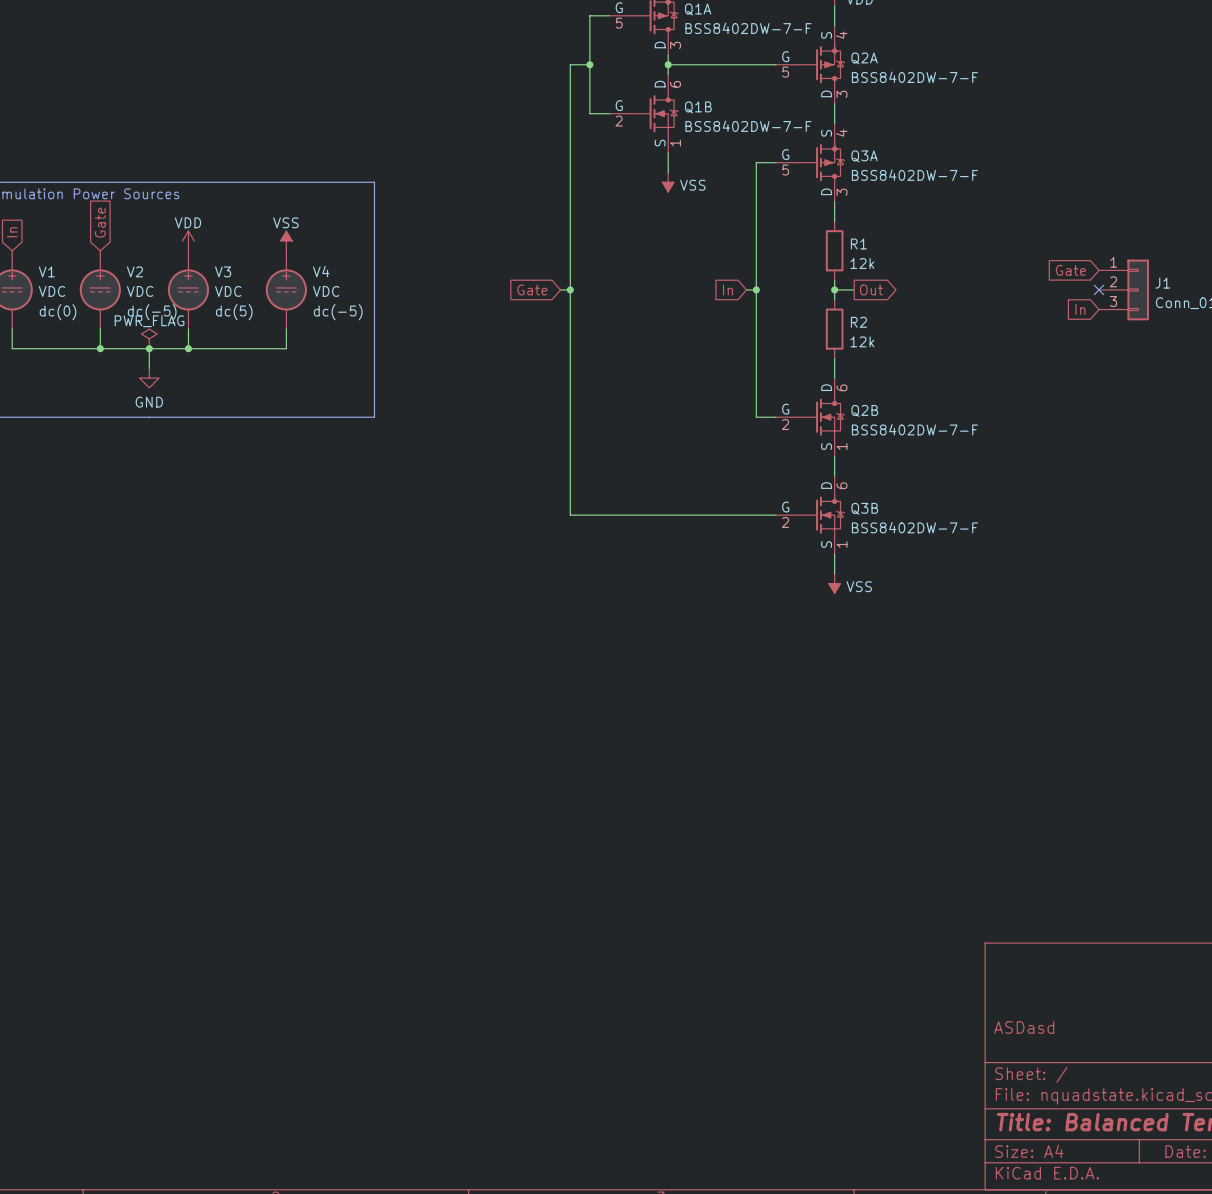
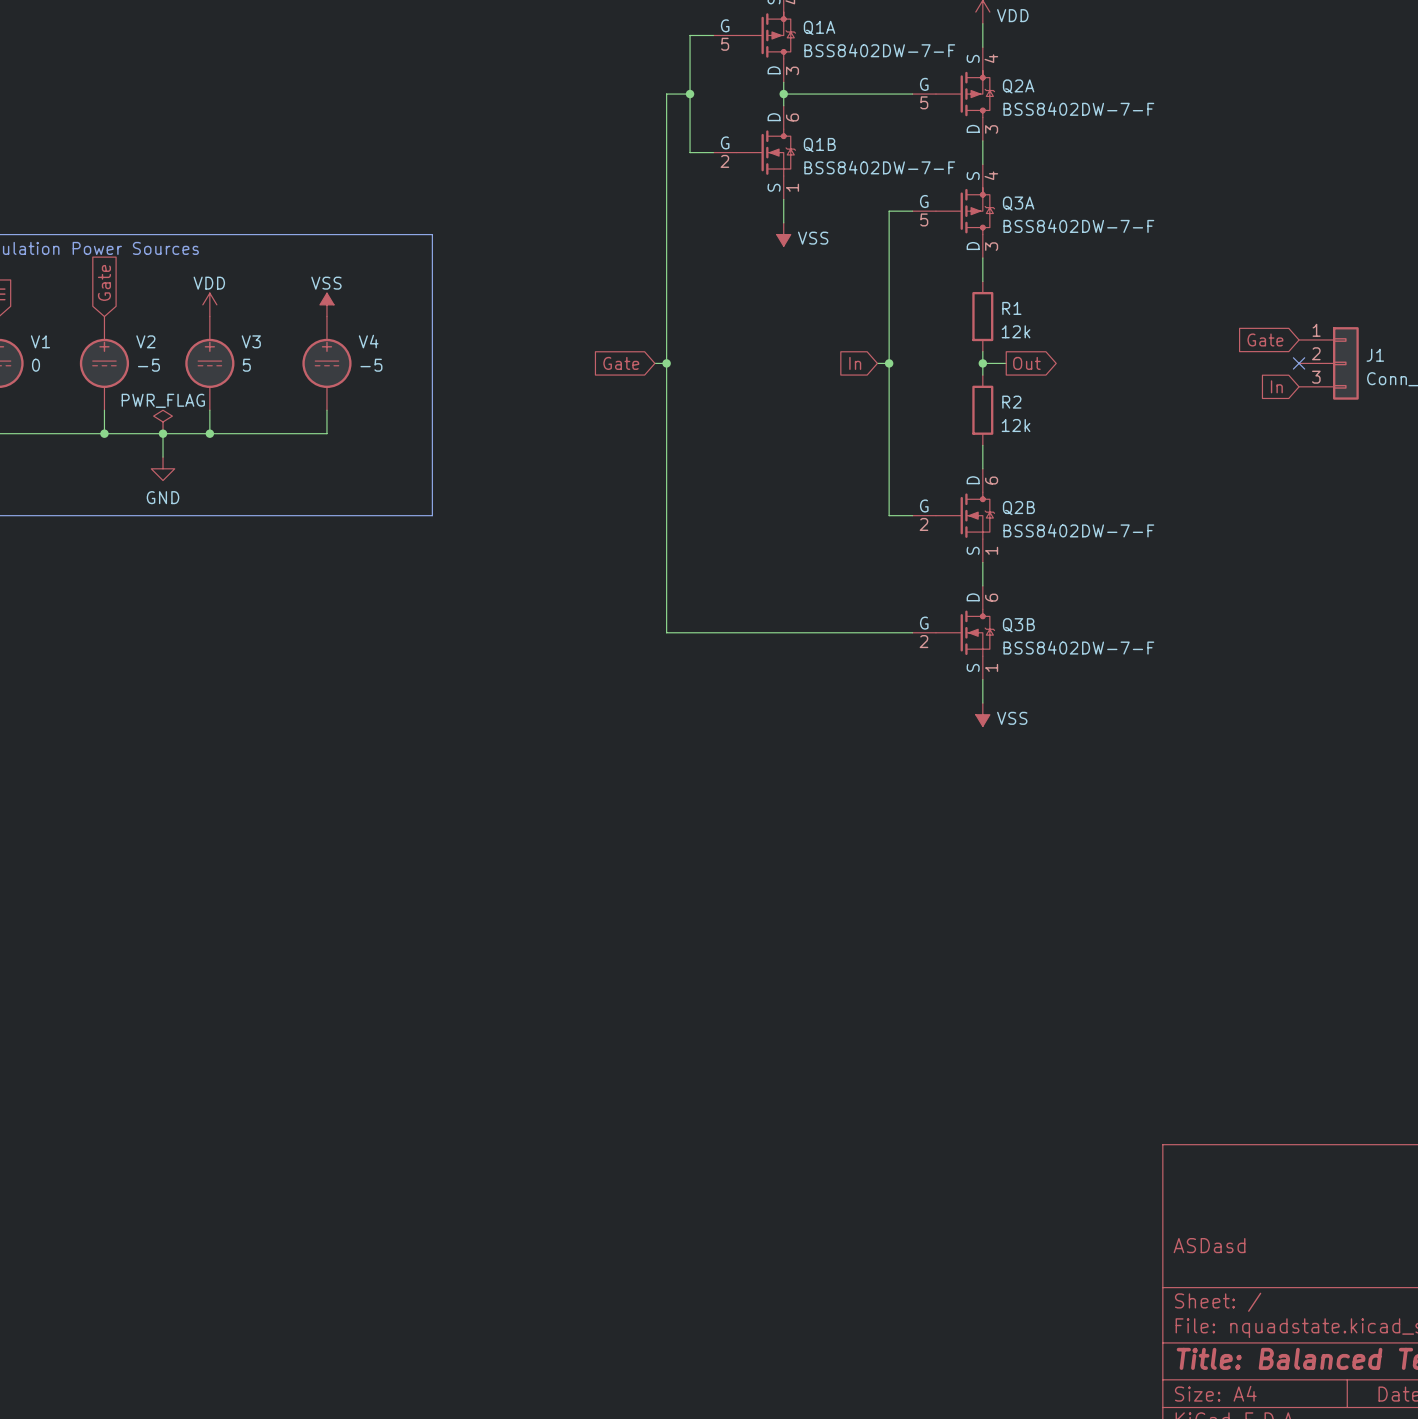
V1 value: VDC (51, 291) -> 0 (36, 365)
V2 value: VDC (140, 291) -> -5 (148, 365)
V3 value: VDC (228, 291) -> 5 (246, 365)
V4 value: VDC (326, 291) -> -5 (371, 365)
V1 text: dc(0) (58, 312) -> none
V2 text: dc(-5) (152, 312) -> none
V3 text: dc(5) (234, 312) -> none
V4 text: dc(-5) (338, 312) -> none

